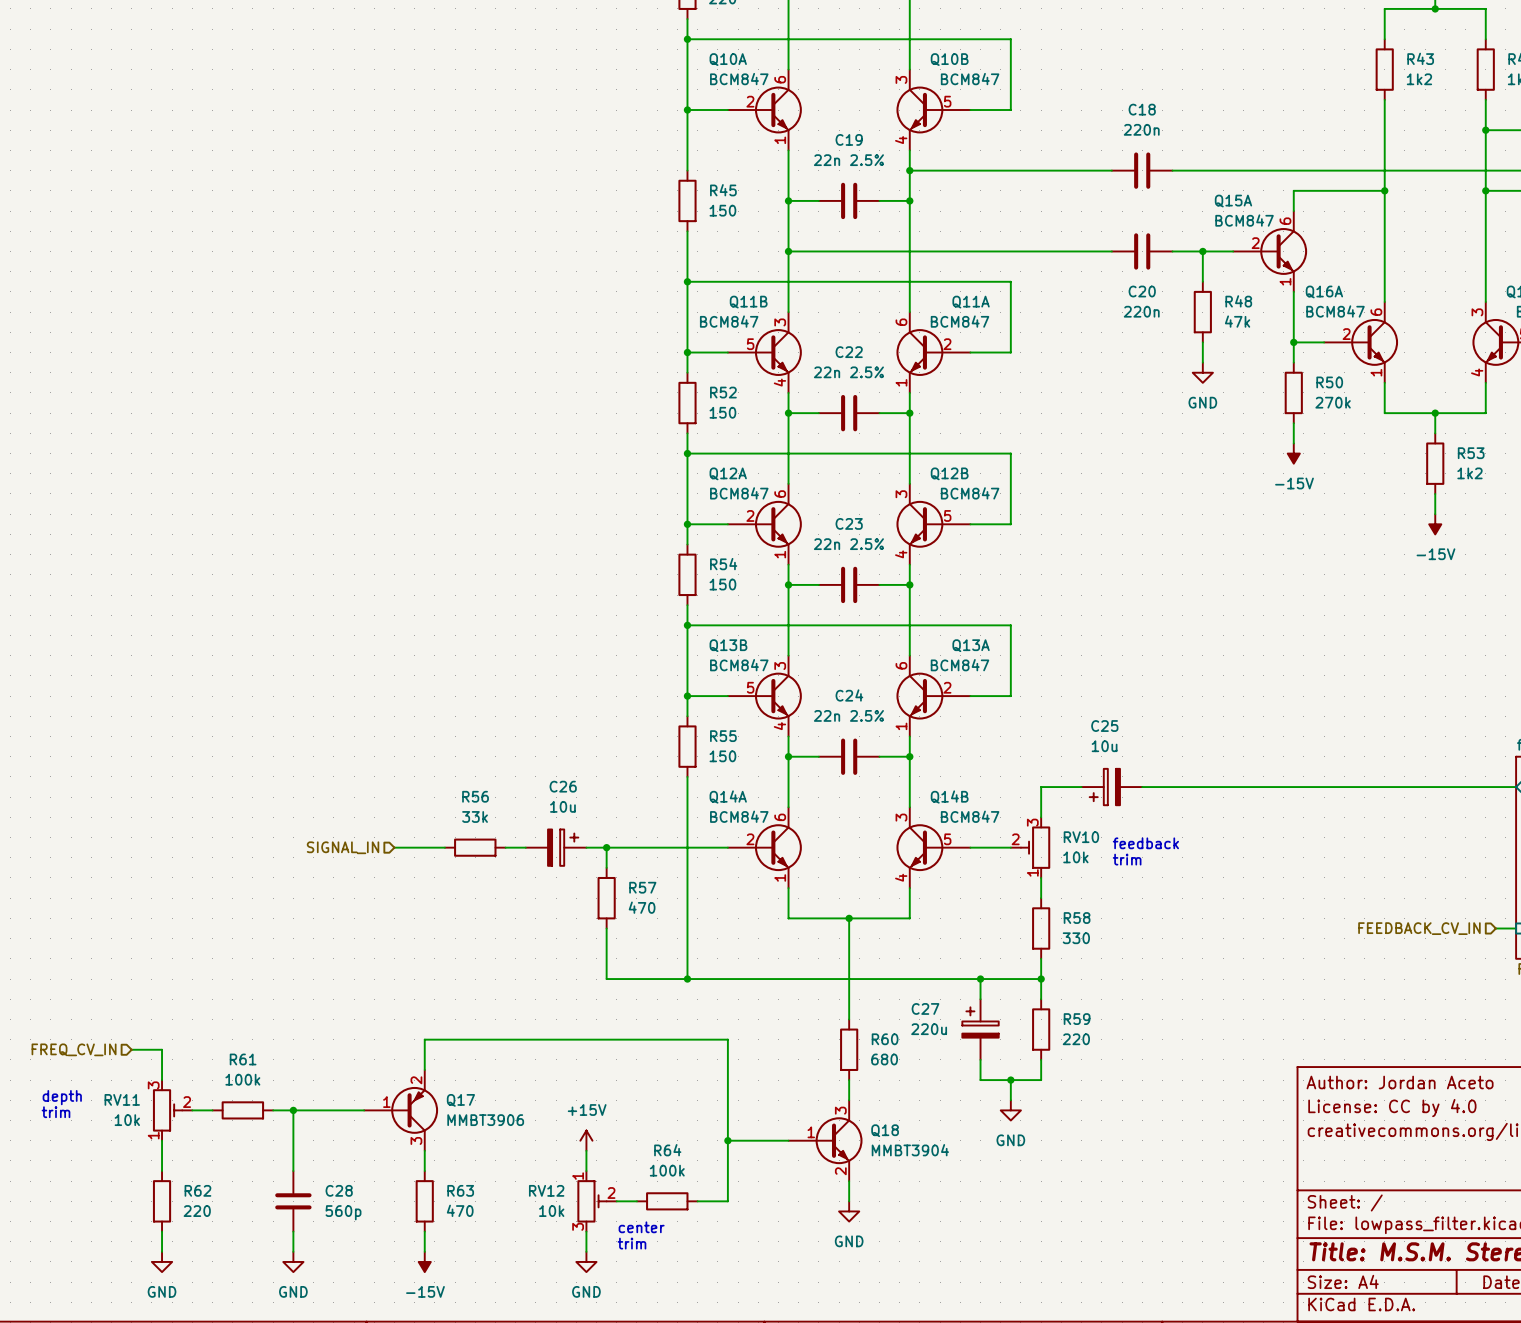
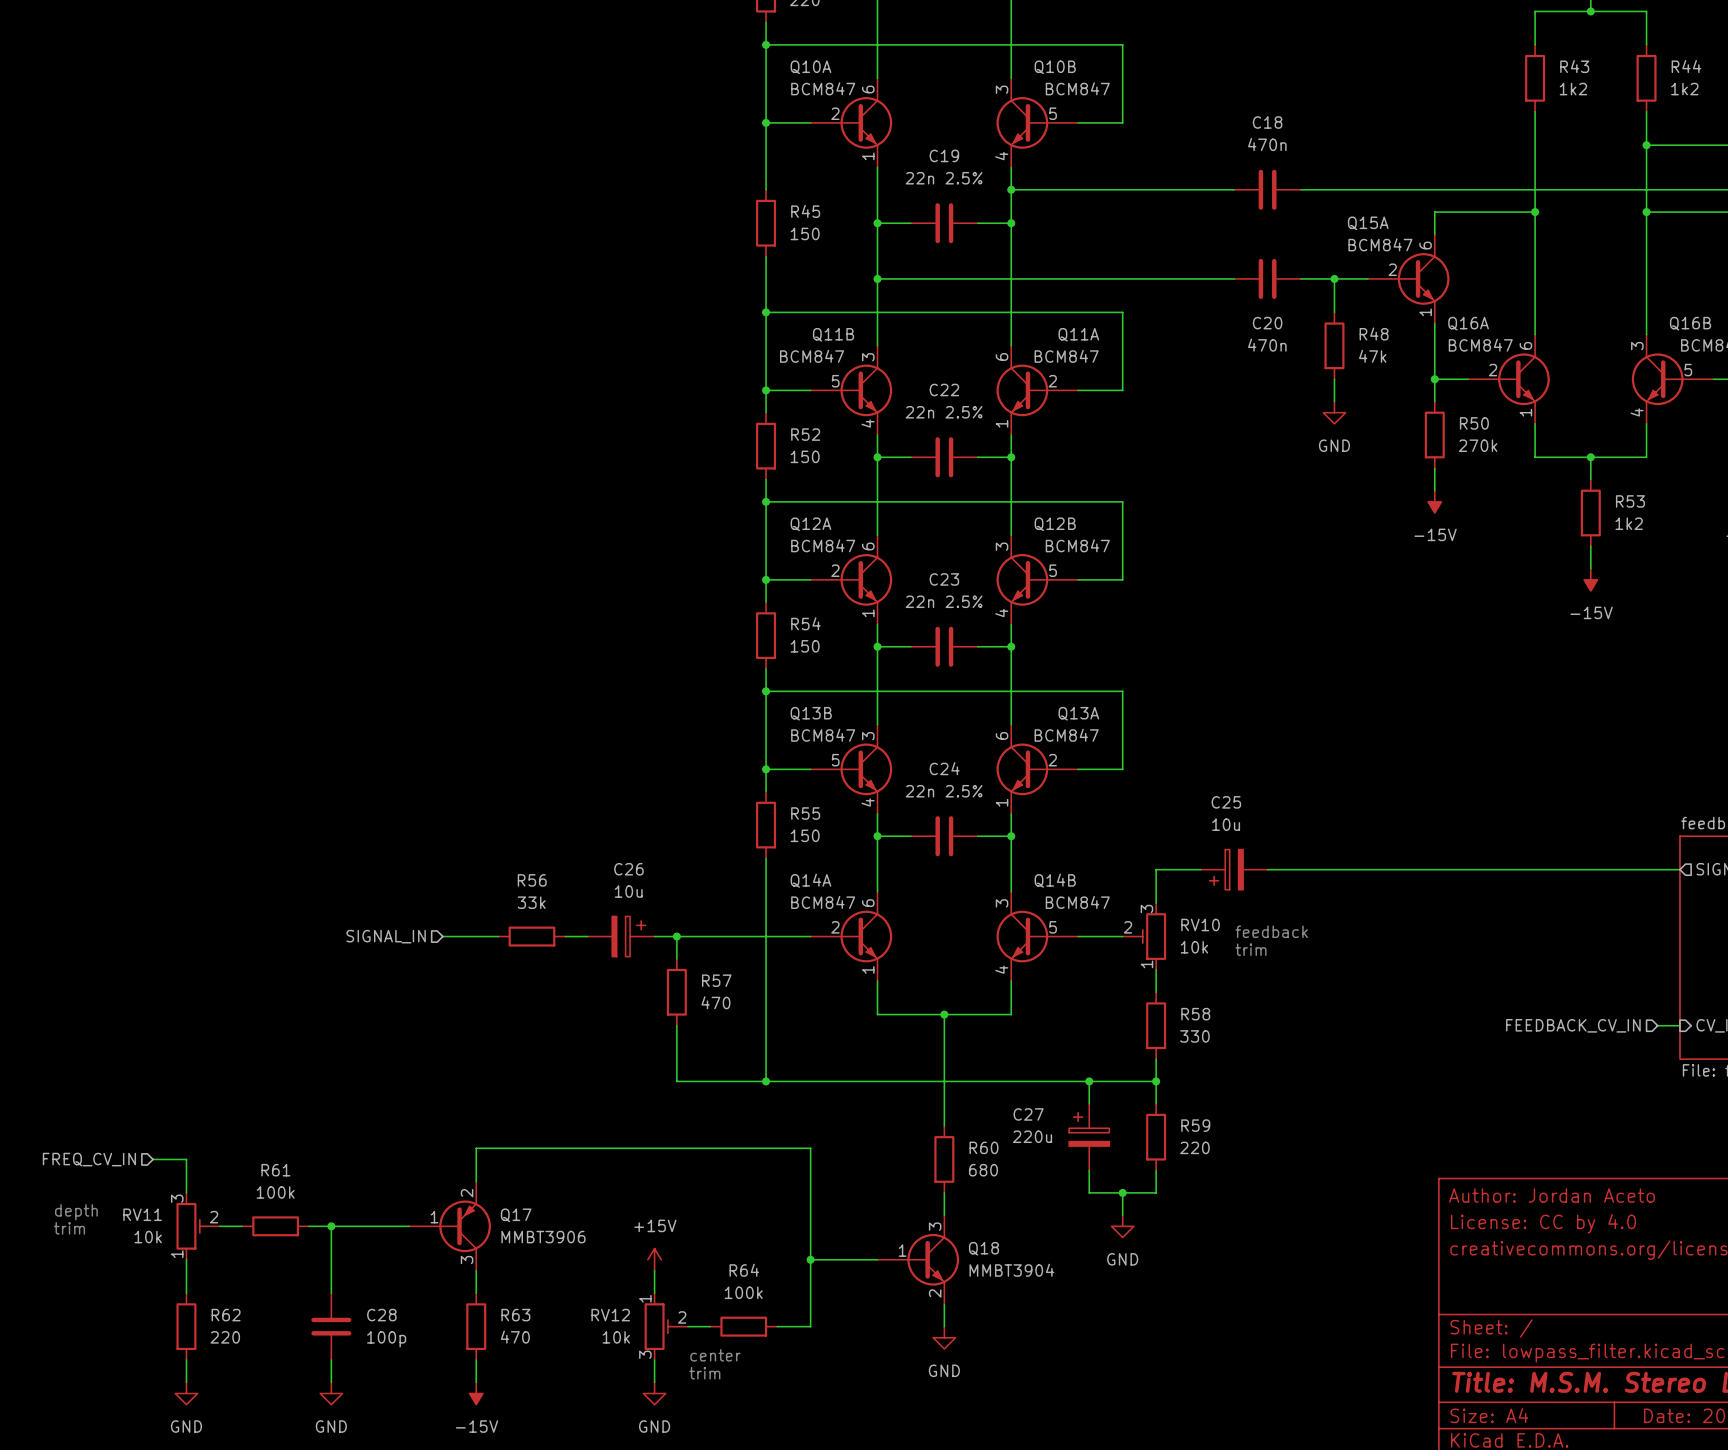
C18 value: 220n (1141, 129) -> 470n (1267, 144)
C20 value: 220n (1141, 311) -> 470n (1267, 345)
C28 value: 560p (343, 1212) -> 100p (386, 1339)

